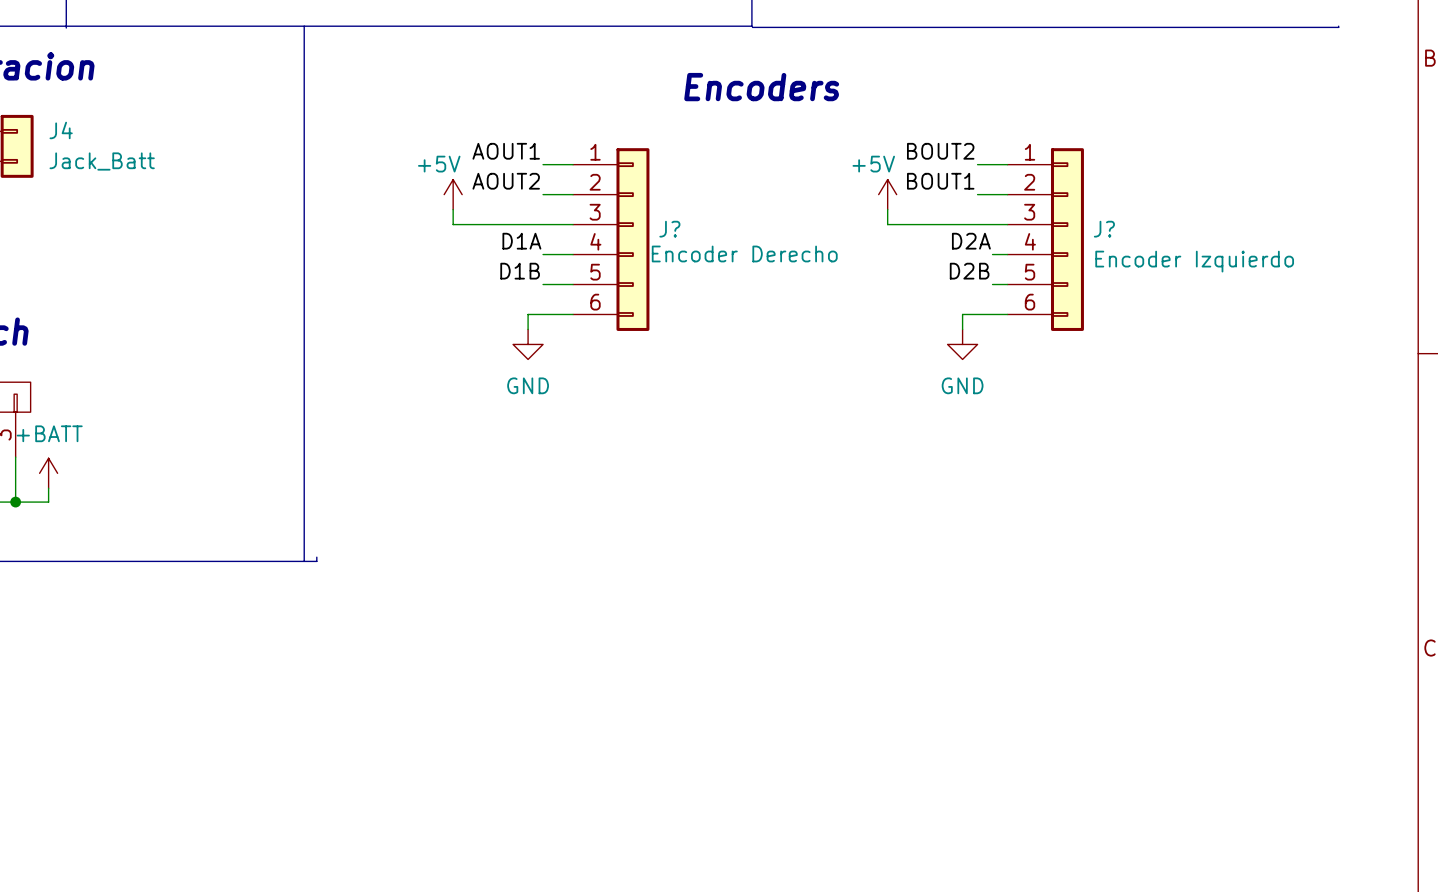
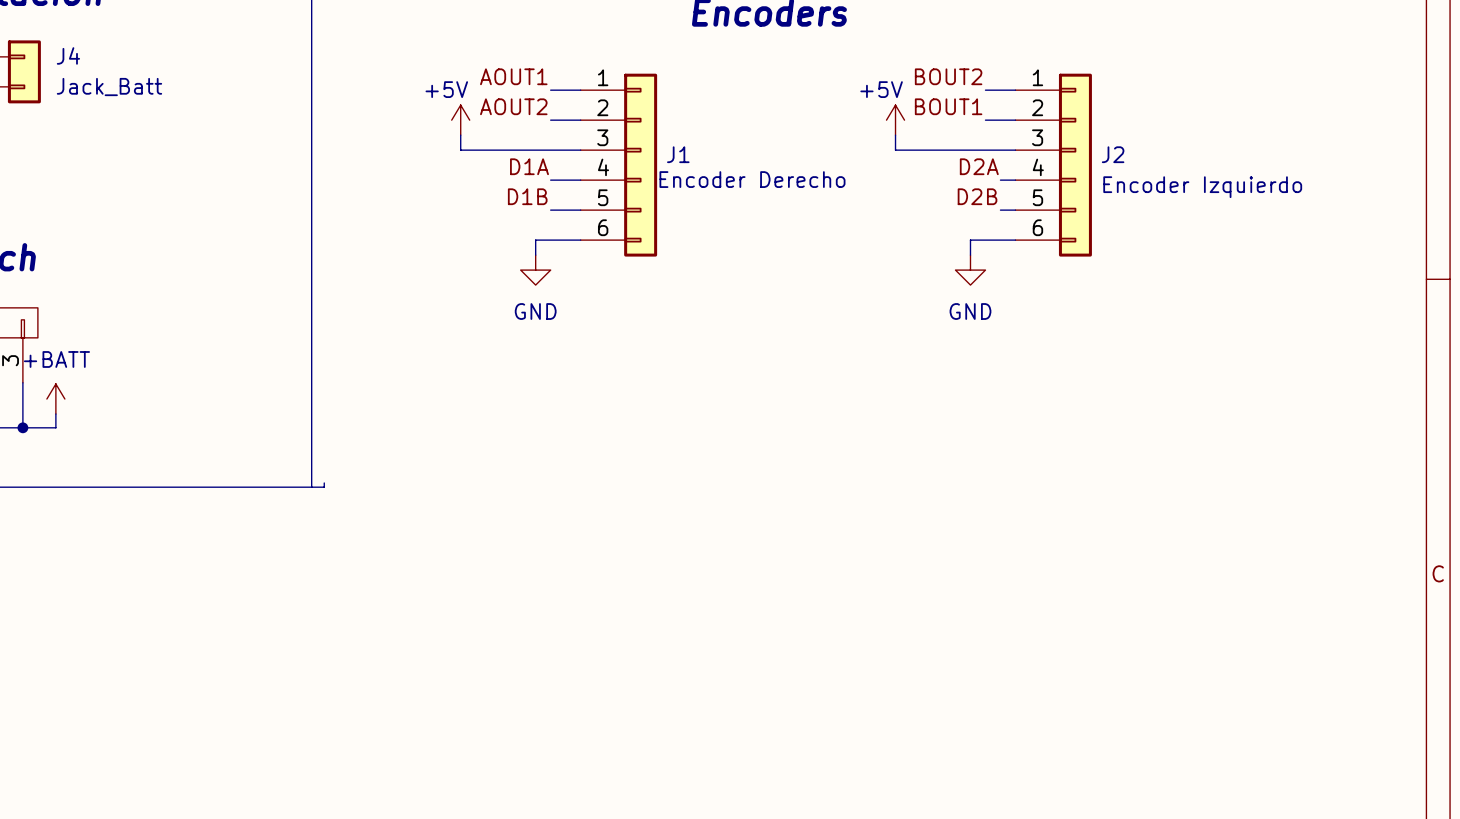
J? name: J? (669, 229) -> J1 (678, 154)
J? name: J? (1104, 229) -> J2 (1113, 154)

